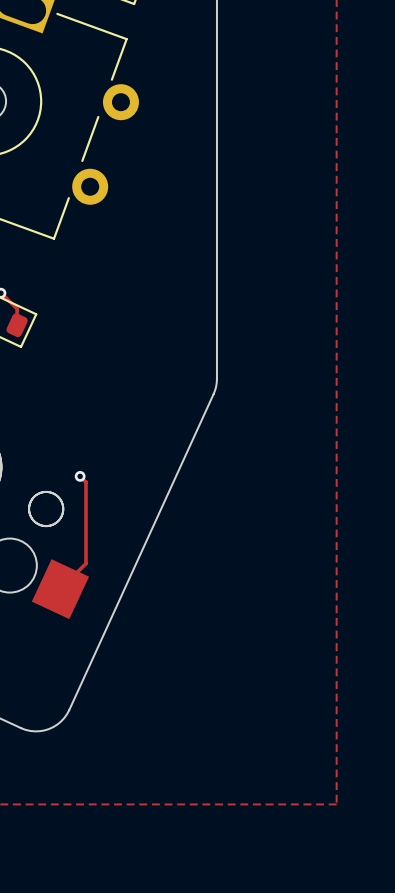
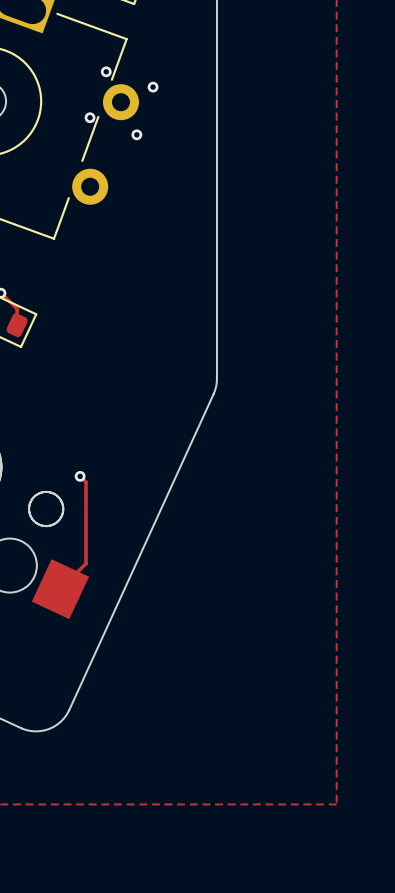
via: none -> (106, 71)
via: none -> (153, 87)
via: none -> (90, 117)
via: none -> (136, 134)

